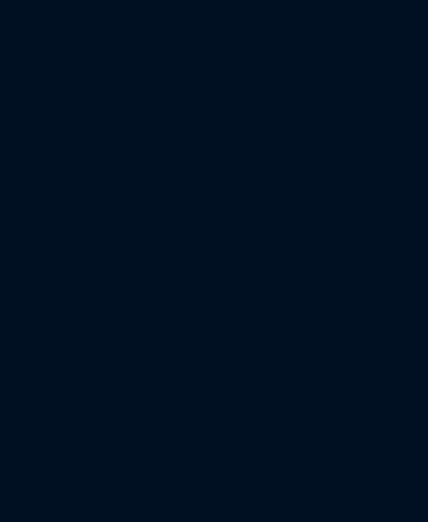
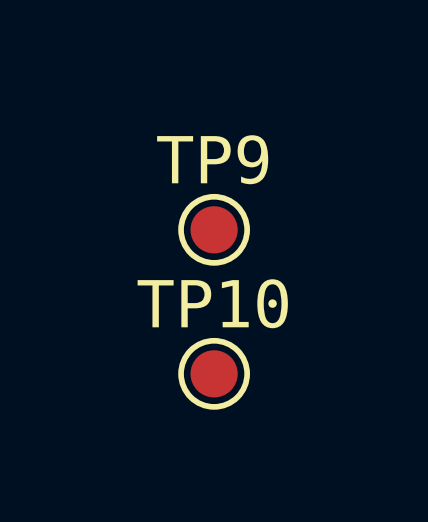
TP9: none -> (214, 229)
TP10: none -> (214, 373)

